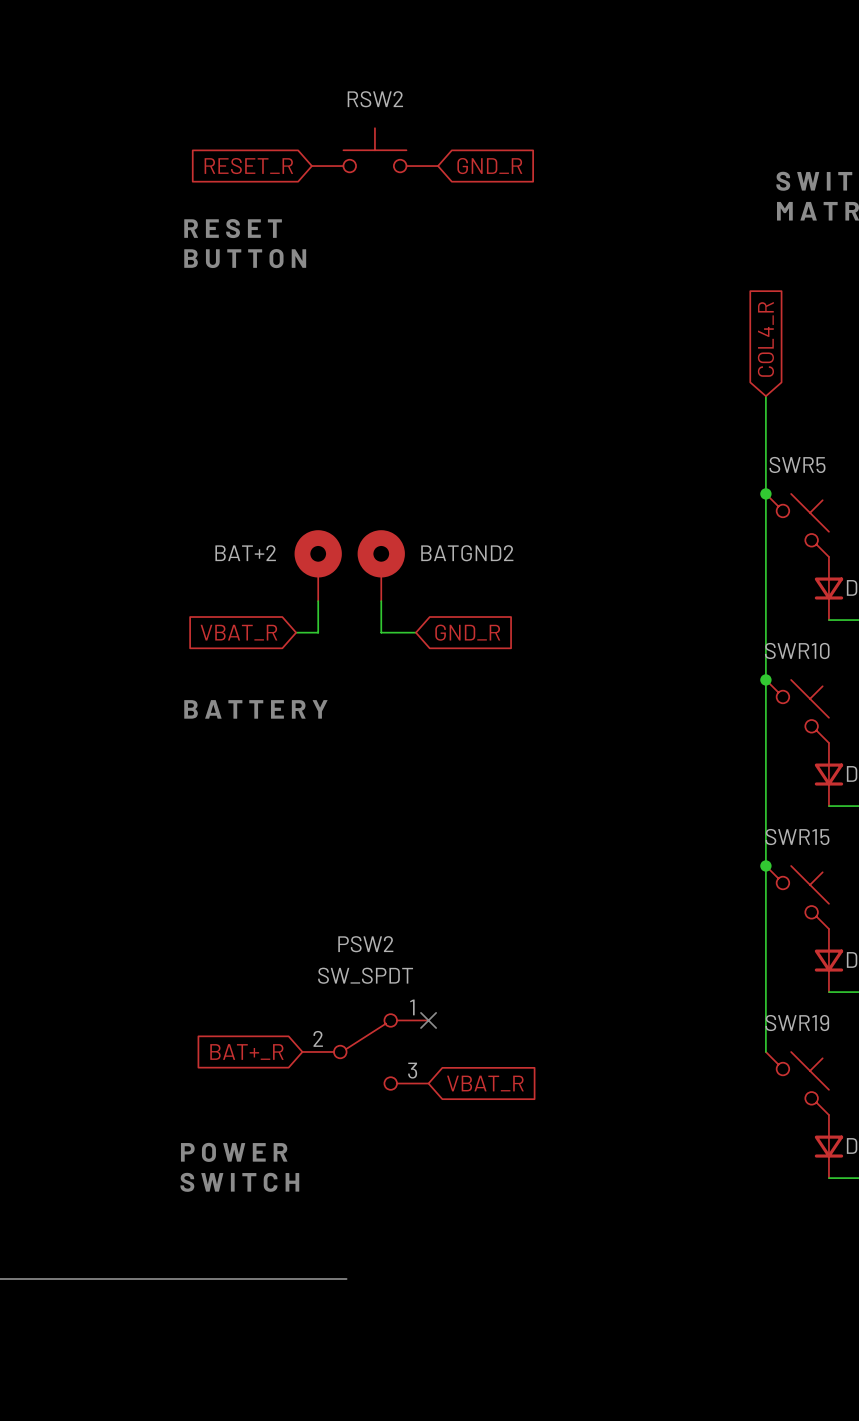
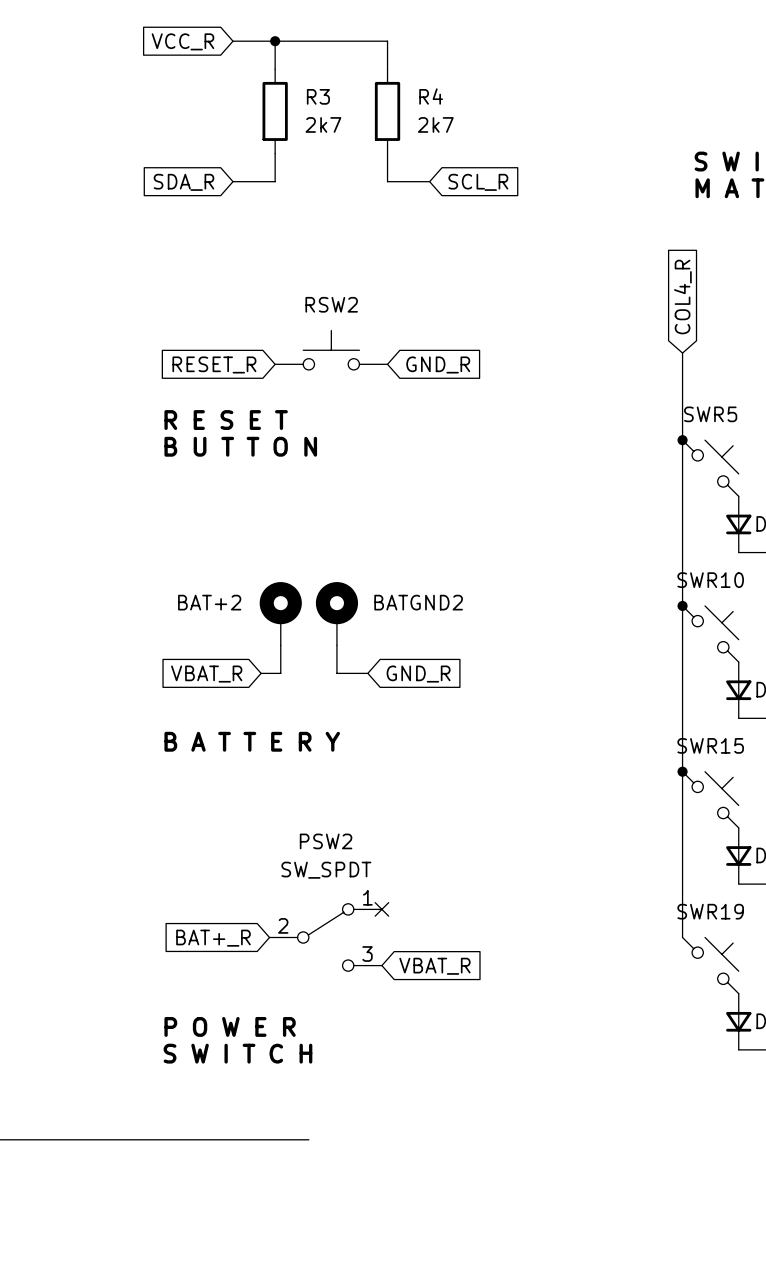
global label: none -> VCC_R (182, 41)
wire: none -> (233, 41) (387, 41) (387, 69)
wire: none -> (275, 41) (275, 69)
junction: none -> (275, 41)
R3: none -> 2k7 (275, 111)
R4: none -> 2k7 (387, 111)
RSW2 position: (374, 150) -> (331, 350)
global label position: RESET_R (248, 166) -> RESET_R (214, 364)
global label: GND_R (489, 166) -> none
wire: none -> (275, 153) (275, 181) (233, 181)
wire: none -> (387, 153) (387, 181) (429, 181)
global label: none -> SDA_R (183, 182)
global label: none -> SCL_R (478, 182)
text position: R E S E T (233, 228) -> R E S E T (226, 420)
text position: B U T T O N (245, 258) -> B U T T O N (240, 446)
global label: none -> GND_R (438, 364)
BAT+2 position: (318, 565) -> (280, 613)
BATGND2 position: (381, 565) -> (336, 613)
wire: (318, 601) (318, 632) (296, 632) -> (280, 645) (280, 673) (261, 673)
wire: (381, 601) (381, 632) (415, 632) -> (336, 645) (336, 673) (367, 673)
global label position: VBAT_R (238, 632) -> VBAT_R (206, 674)
global label: GND_R (467, 632) -> none
text position: B A T T E R Y (255, 709) -> B A T T E R Y (252, 741)
global label: none -> GND_R (418, 674)

